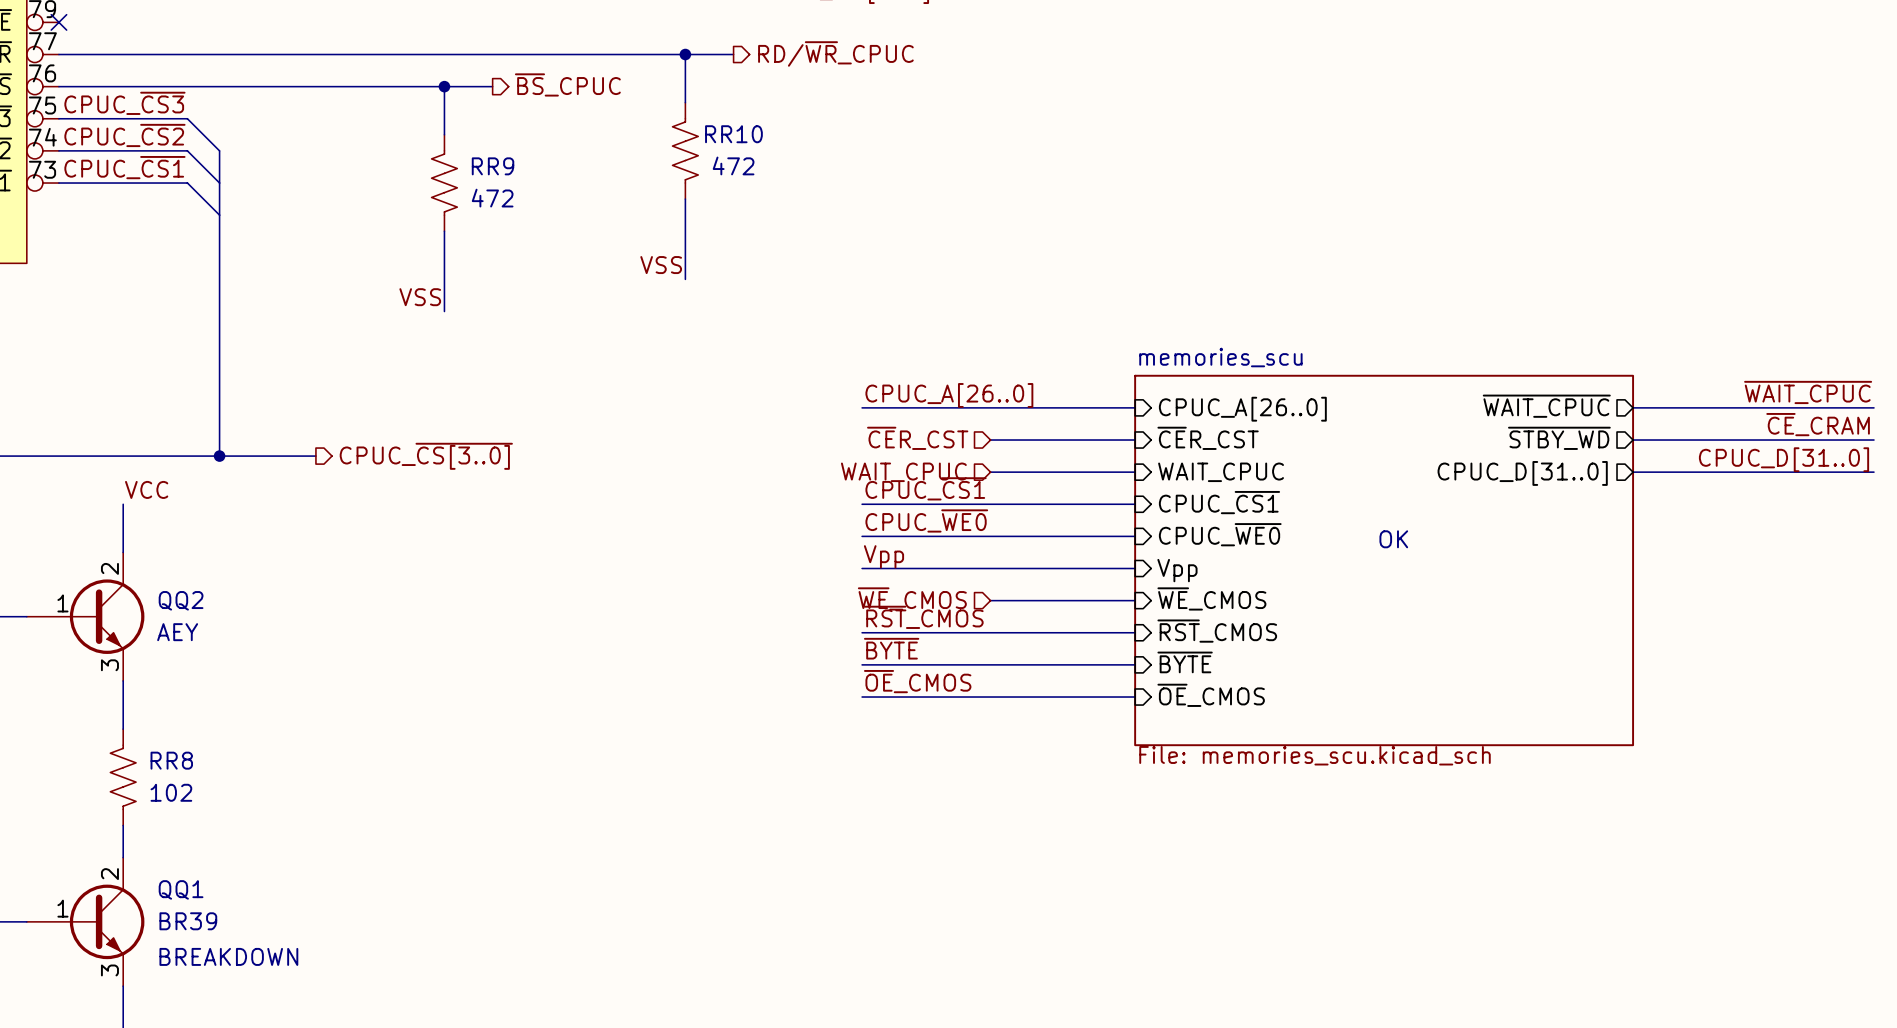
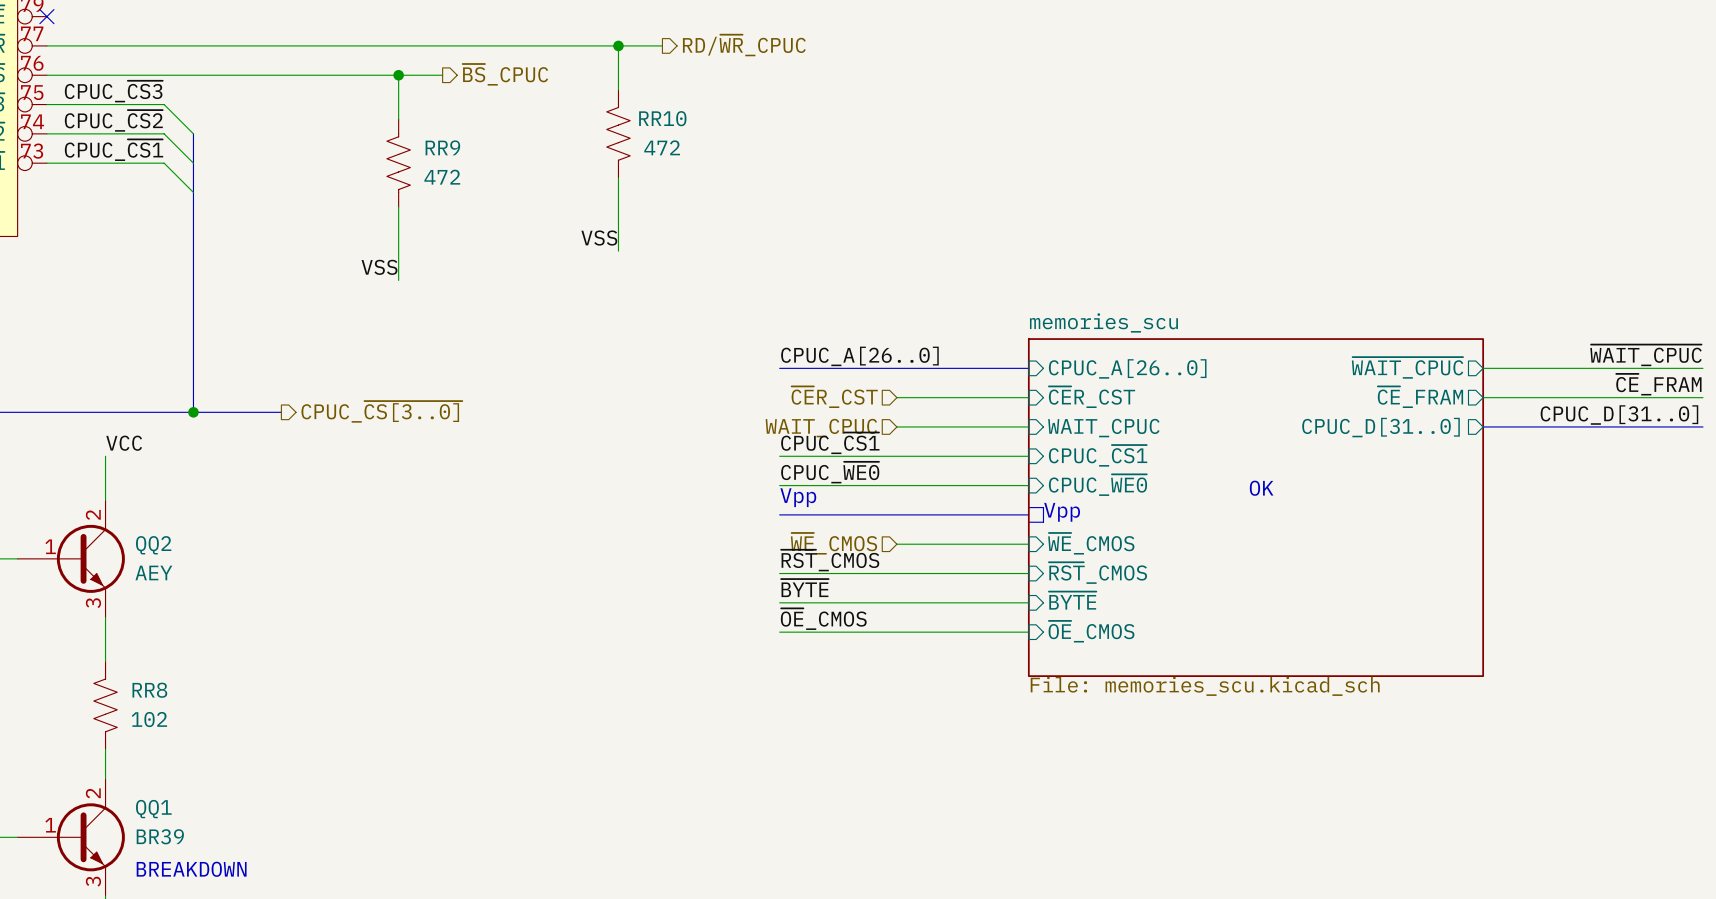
label: ~{CE}_CRAM (1818, 424) -> ~{CE}_FRAM (1658, 384)
sheet pin: ~{STBY_WD} (1559, 438) -> ~{CE}_FRAM (1420, 397)
text: none -> Vpp (798, 497)
label: Vpp (883, 556) -> none
line: none -> (1028, 507) (1043, 507) (1043, 522) (1028, 522)
text: none -> Vpp (1062, 512)
line: none -> (779, 514) (1028, 514)
sheet pin: Vpp (1177, 570) -> none

